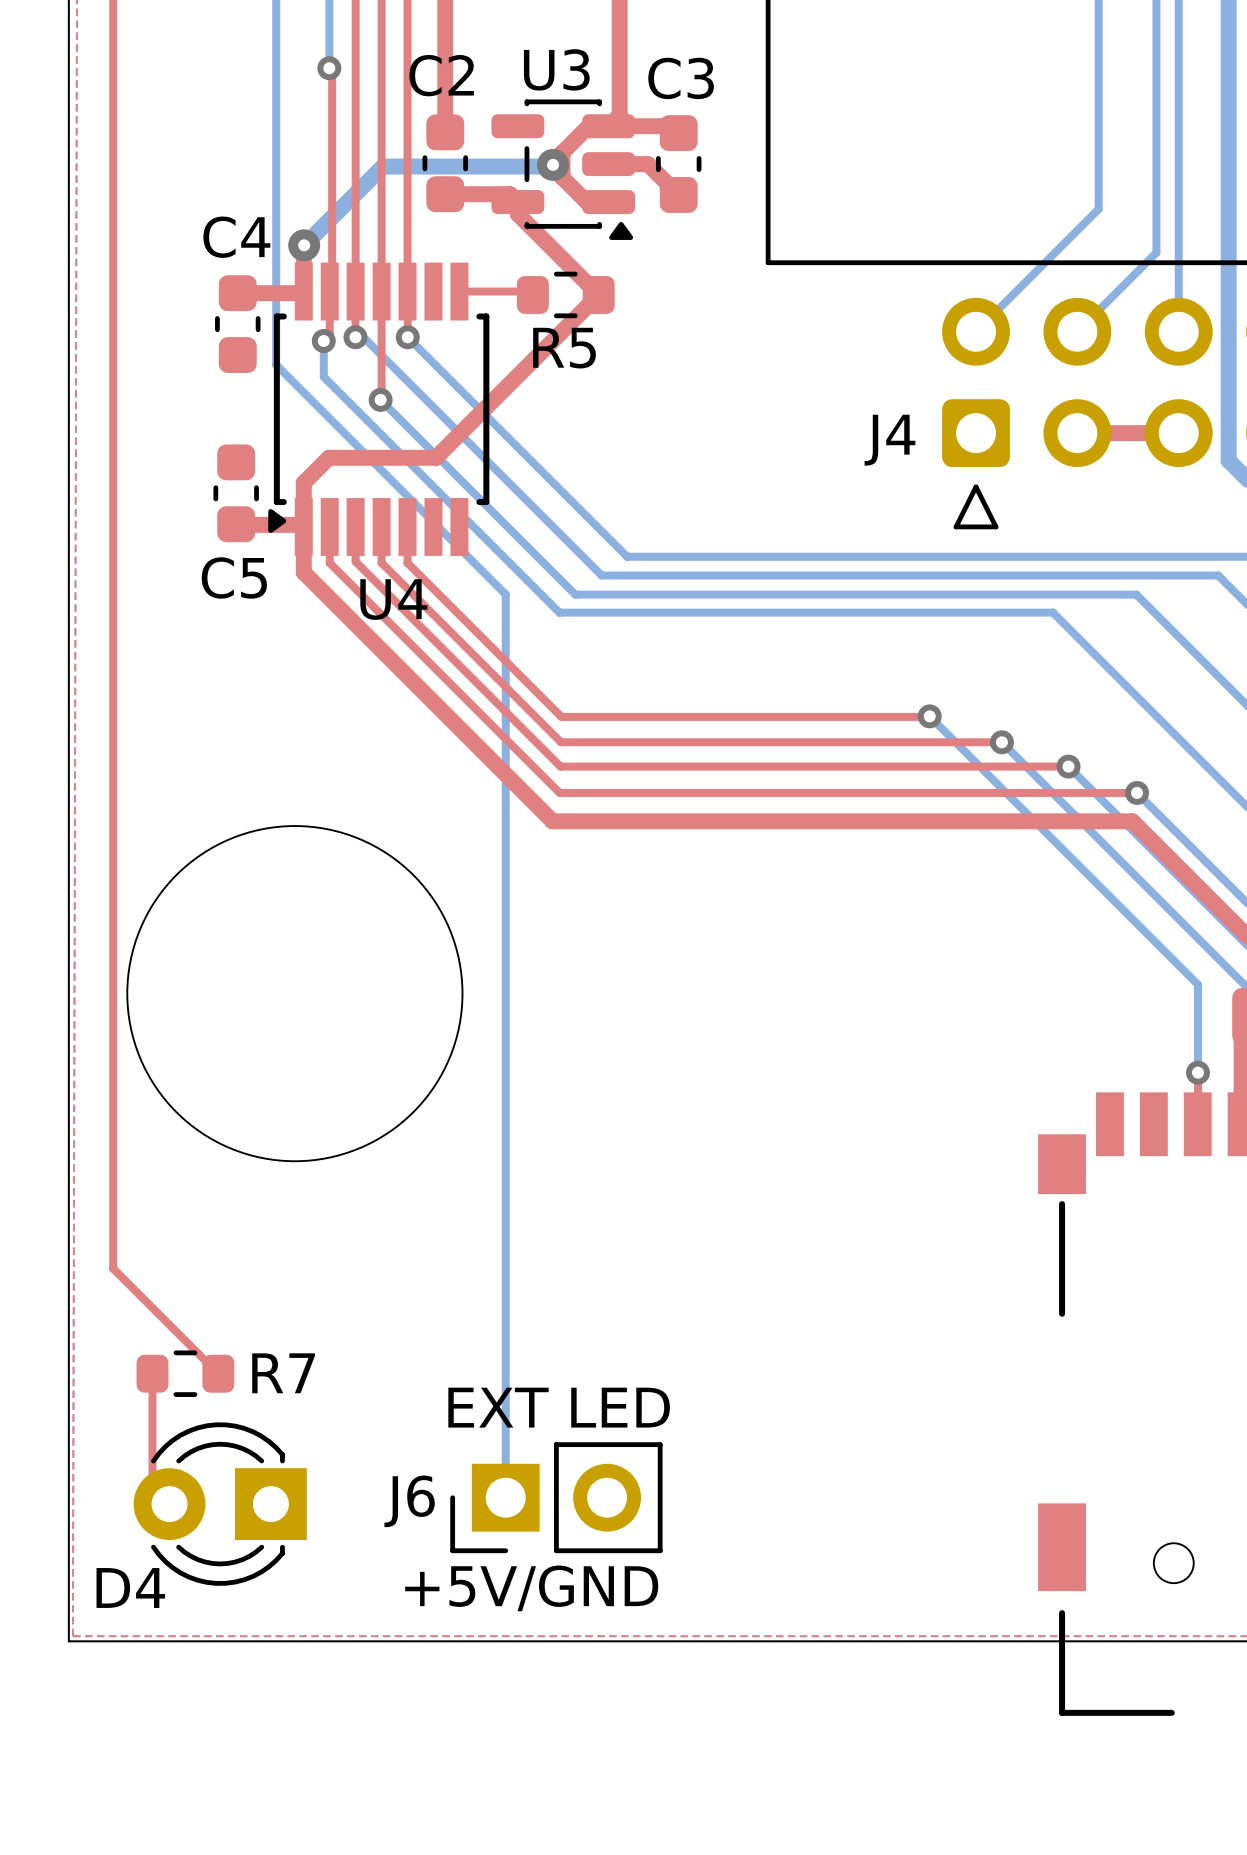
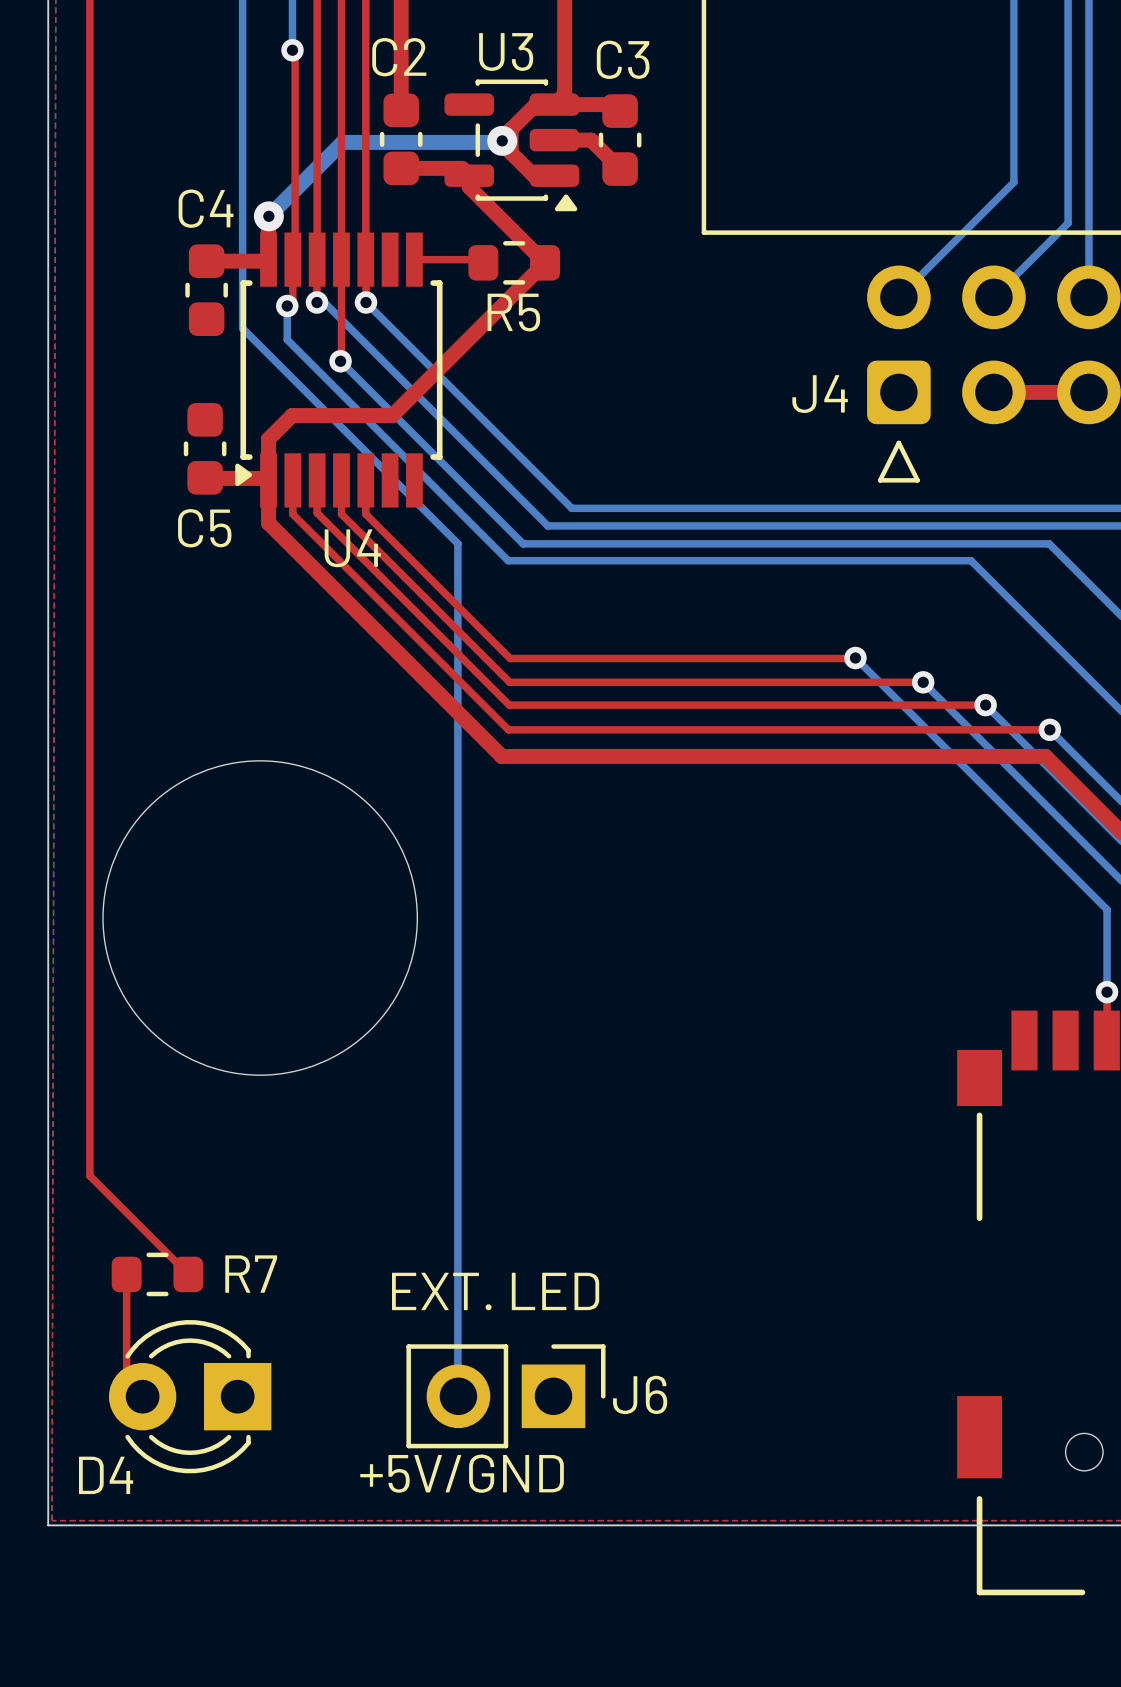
text: none -> EXT. LED (495, 1291)
J6 value: EXT LED (559, 1407) -> none
J6 rotation: 0° (556, 1497) -> 180° (505, 1396)

